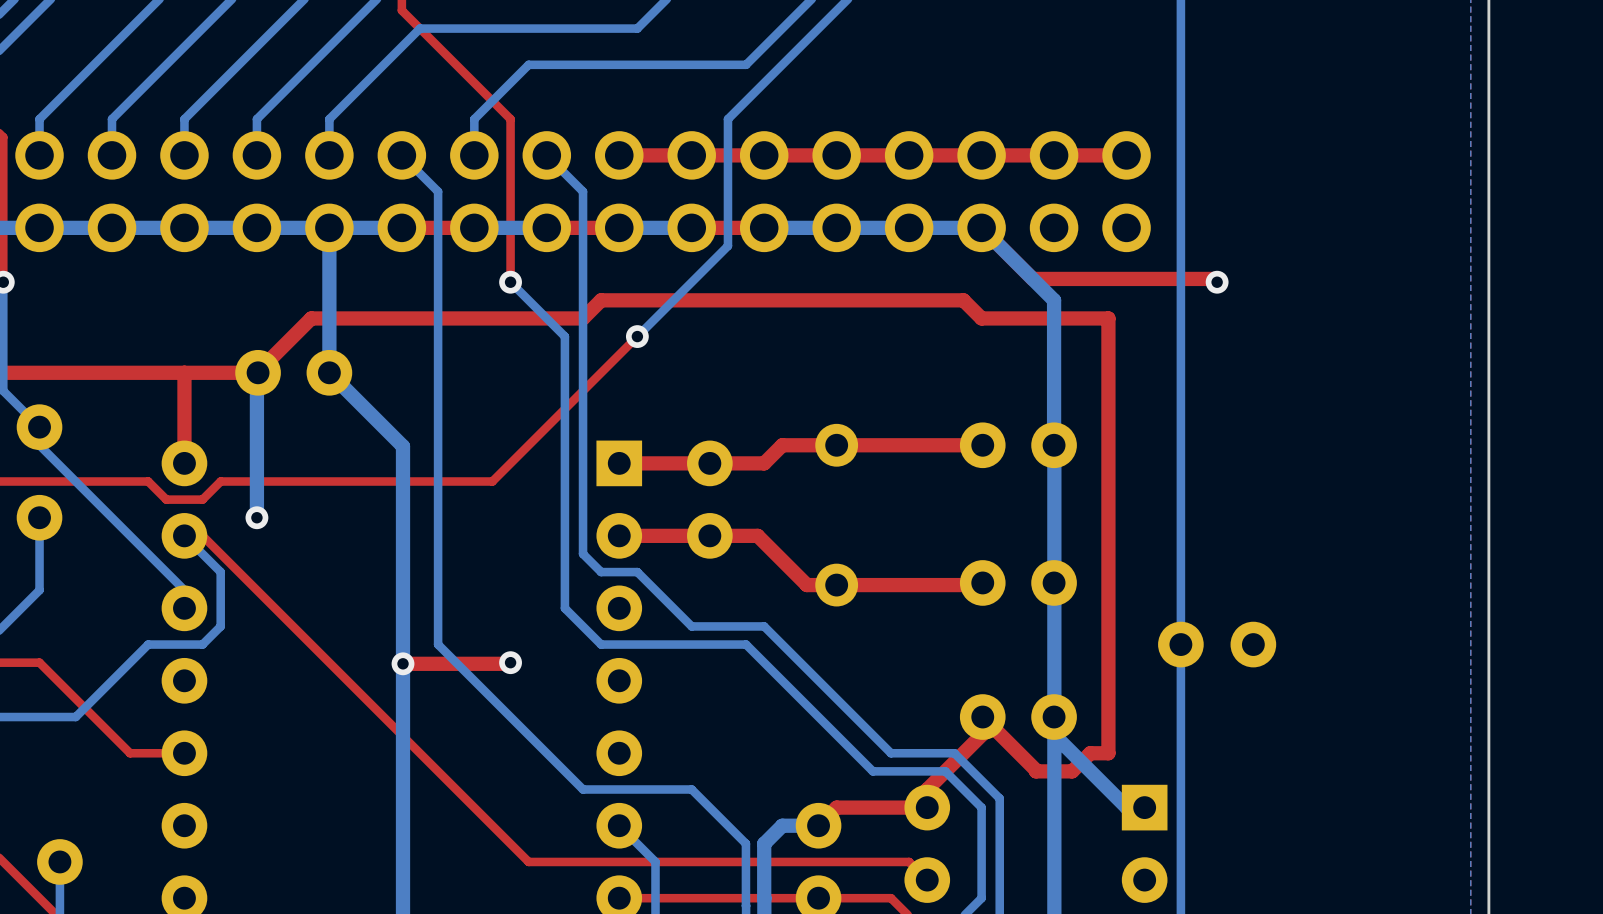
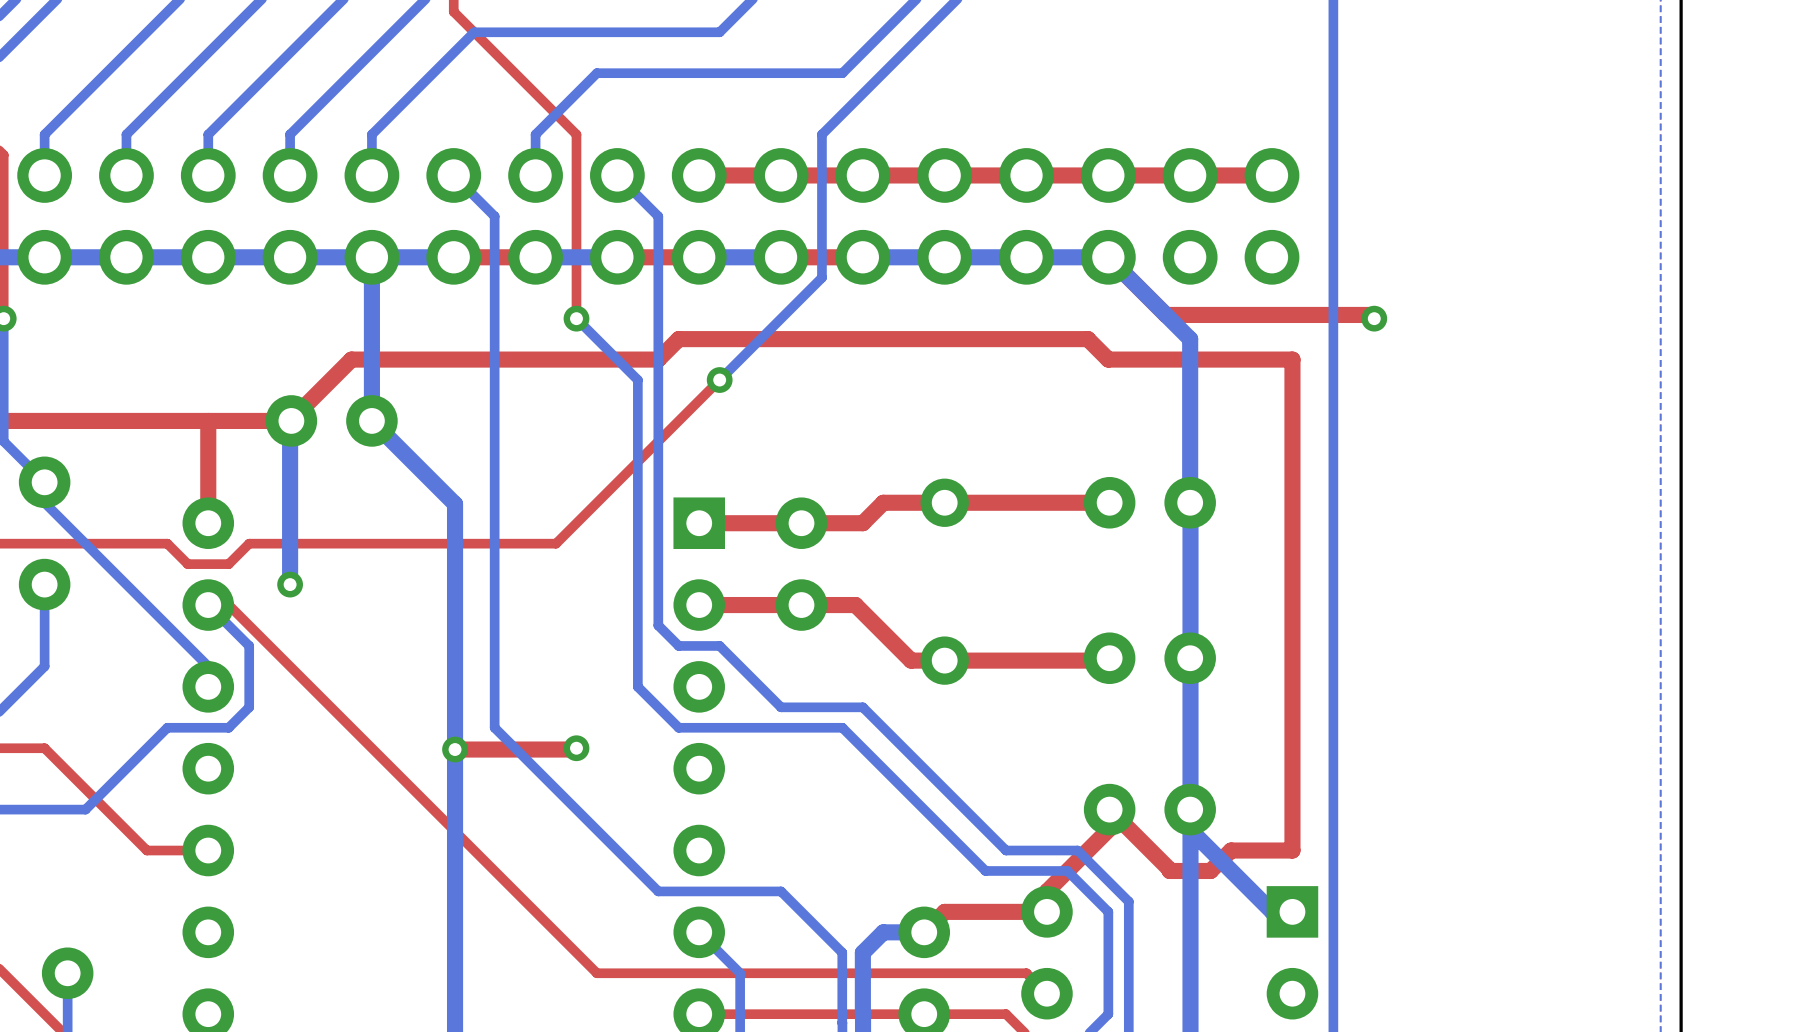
top track: (1108, 318) (1108, 753) -> (1251, 359) (1292, 359) (1292, 850) (1251, 850)
part: (1217, 644) -> none

